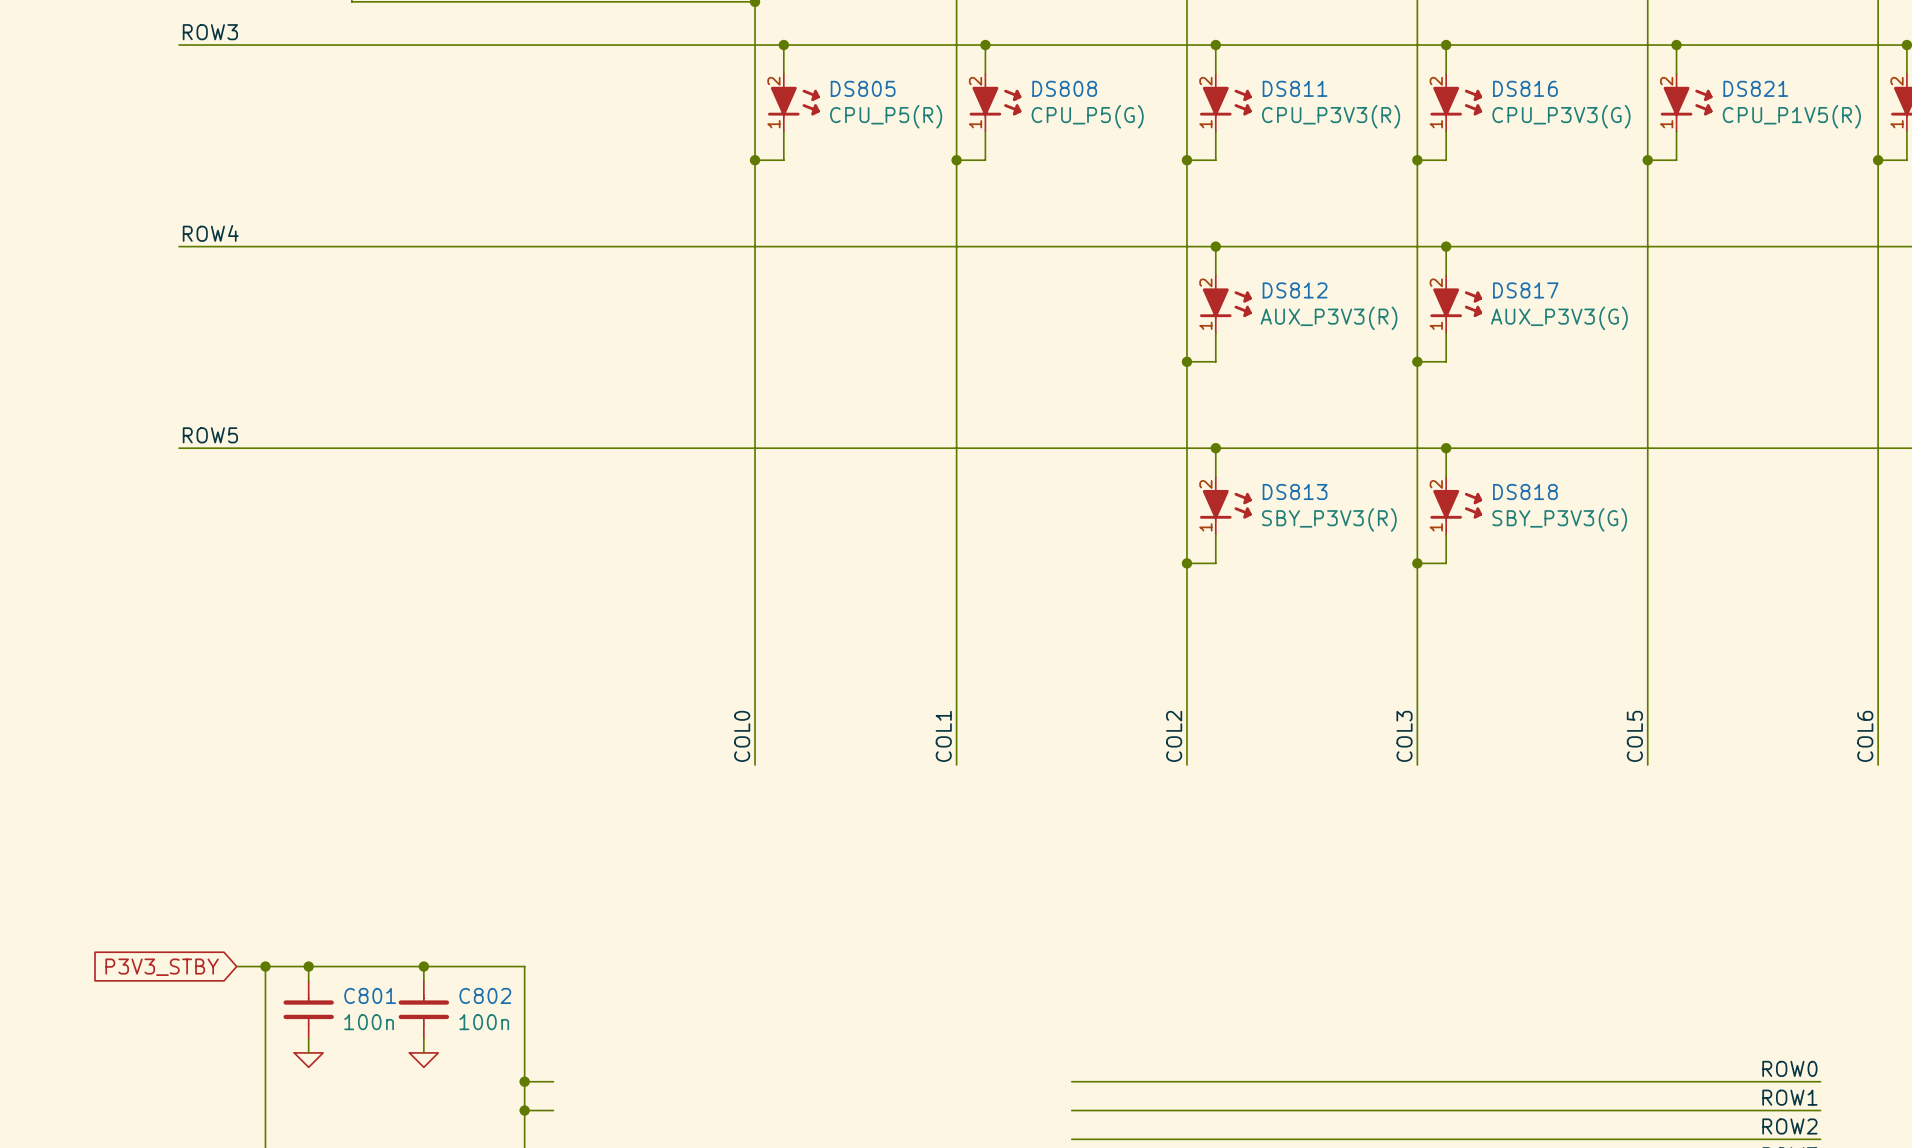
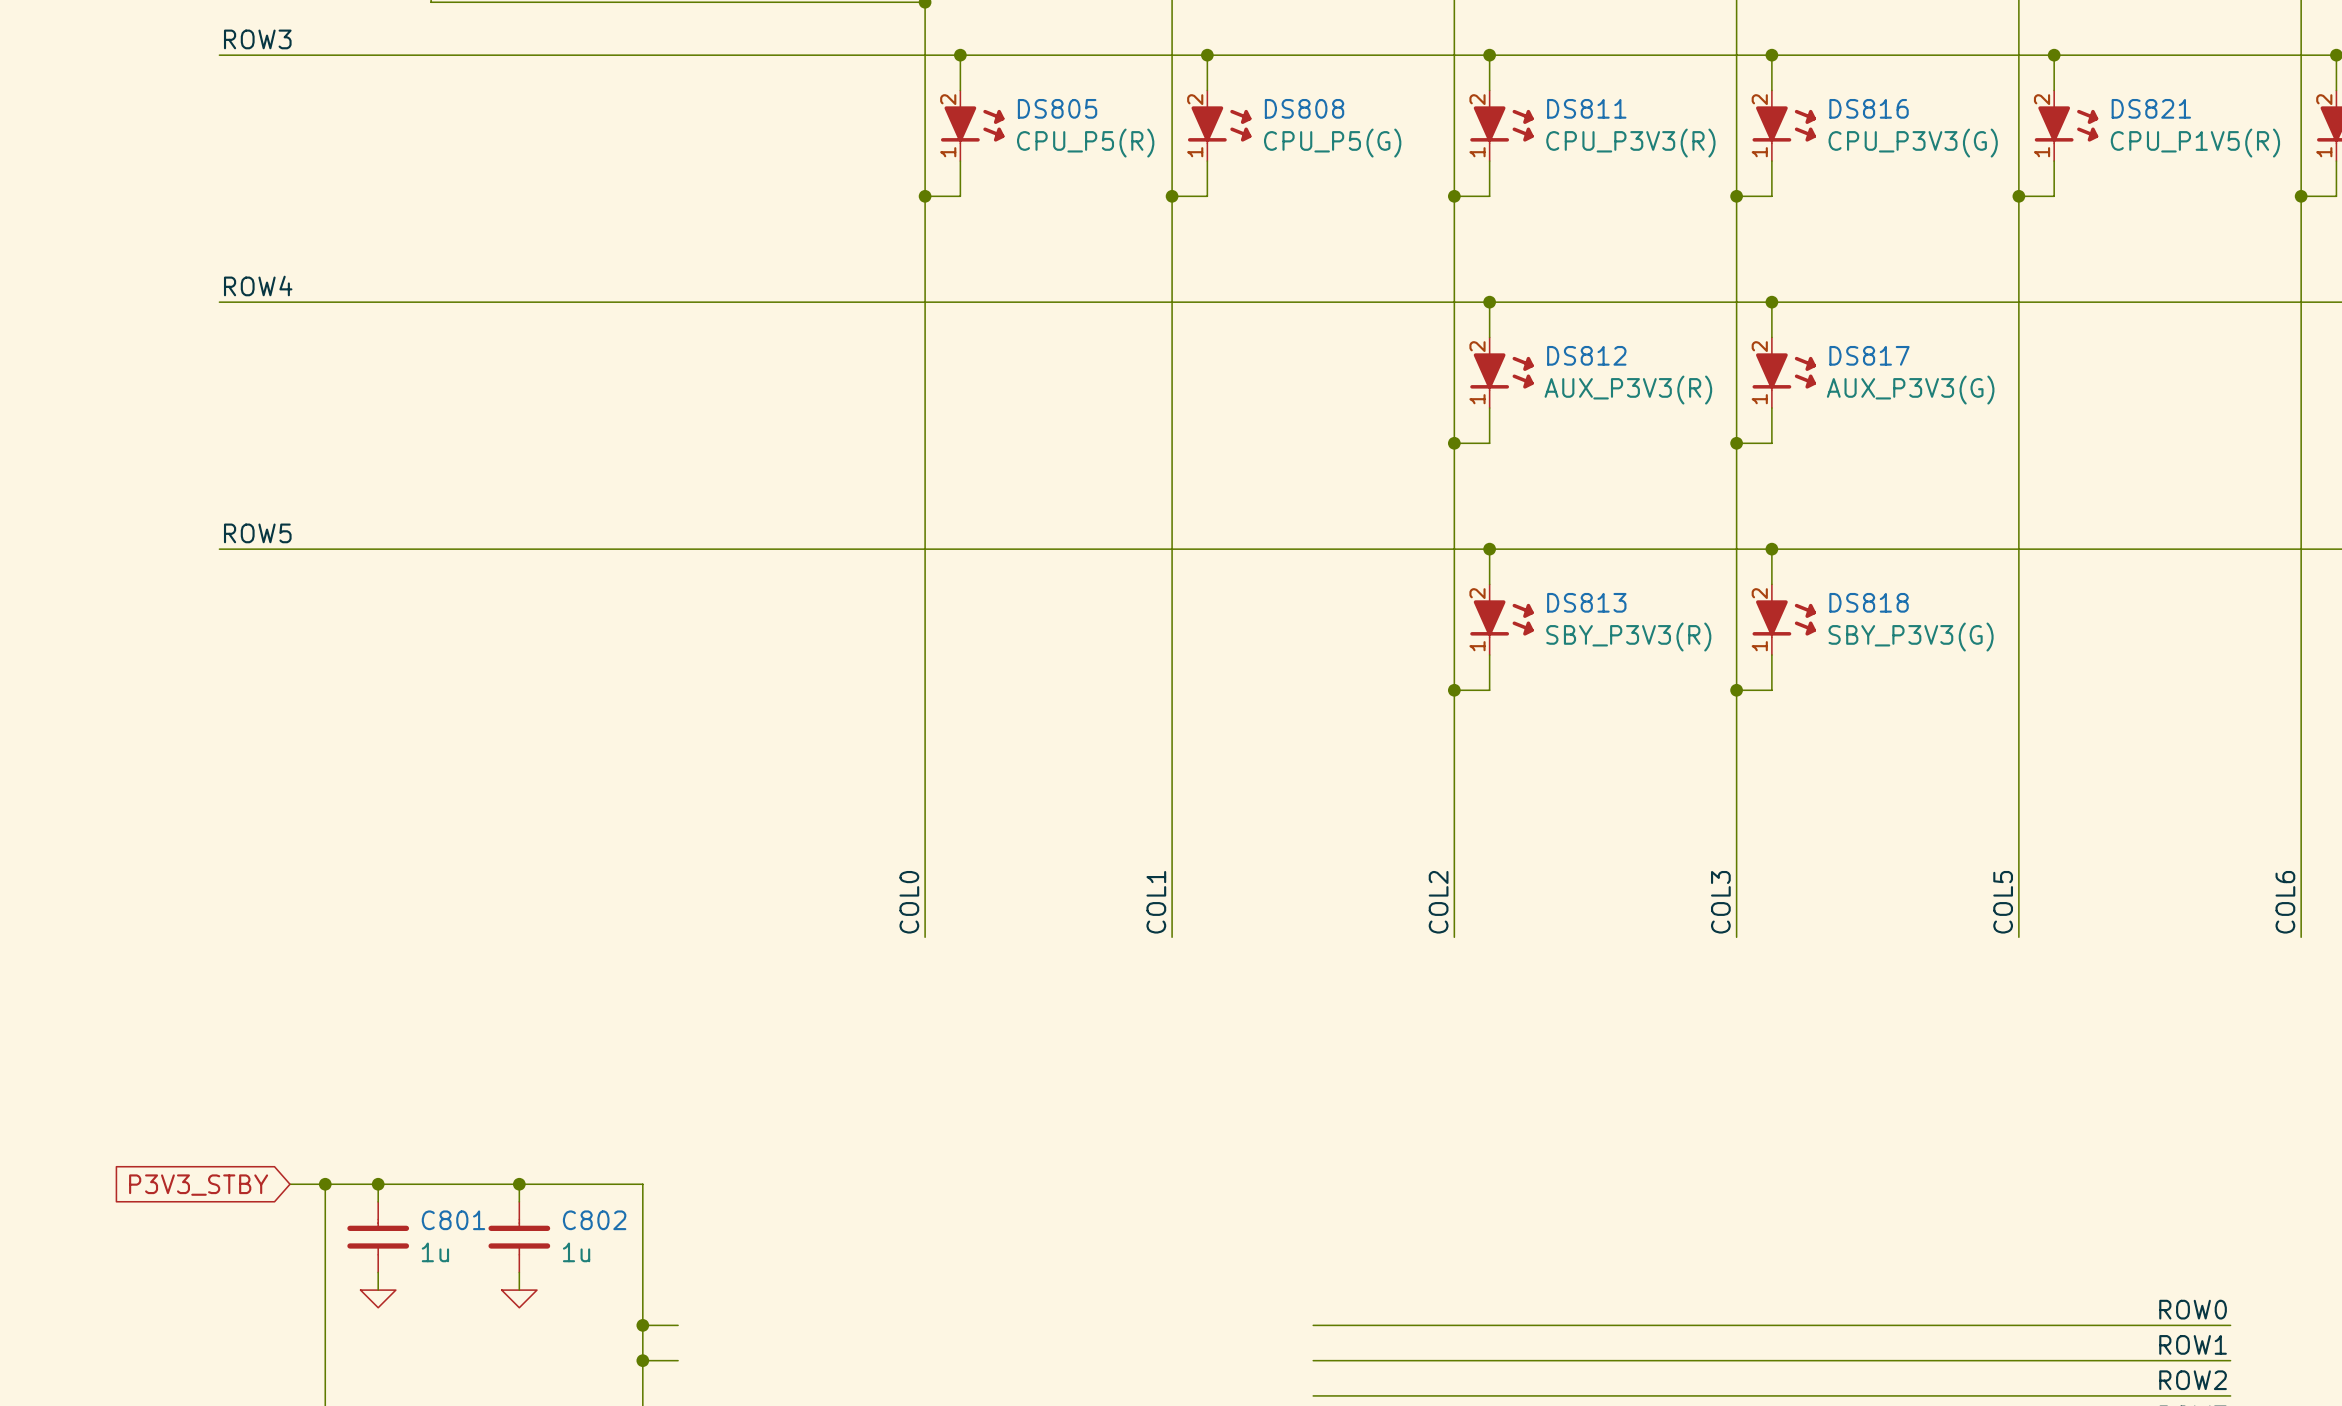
C801 value: 100n (369, 1022) -> 1u (435, 1252)
C802 value: 100n (484, 1022) -> 1u (576, 1252)

